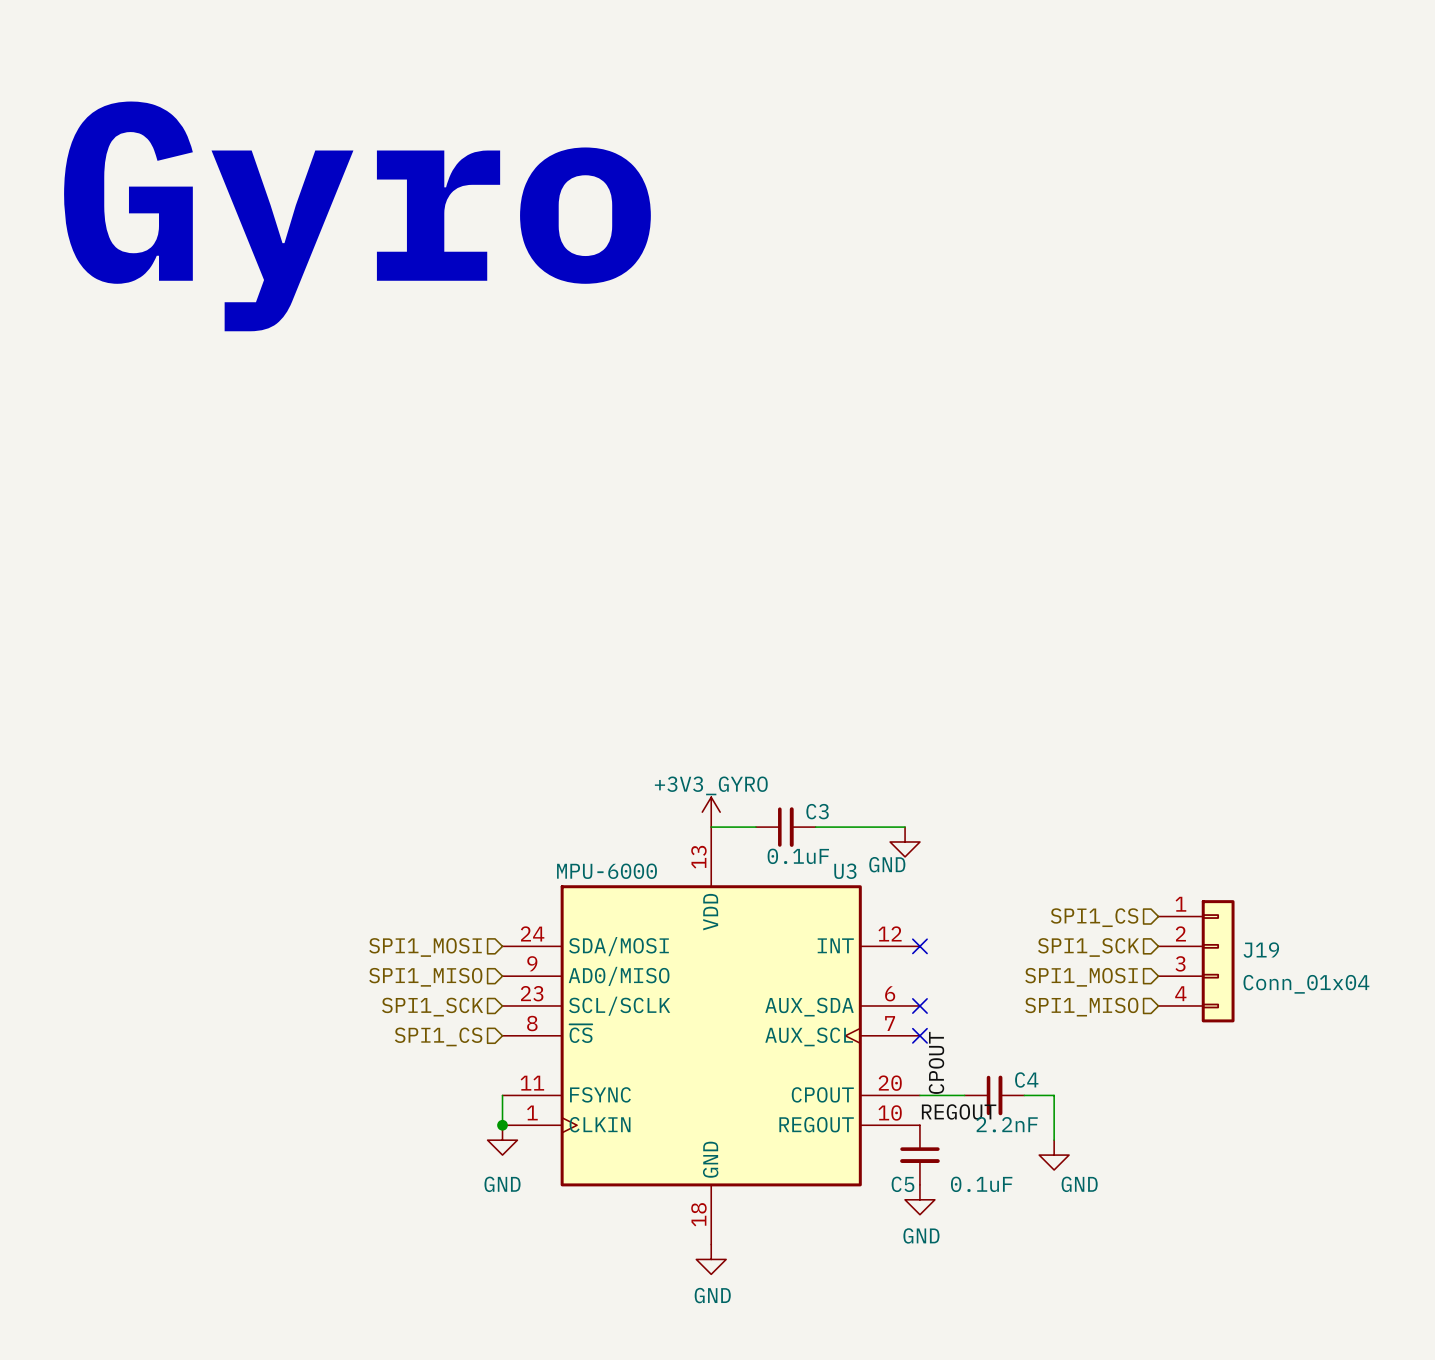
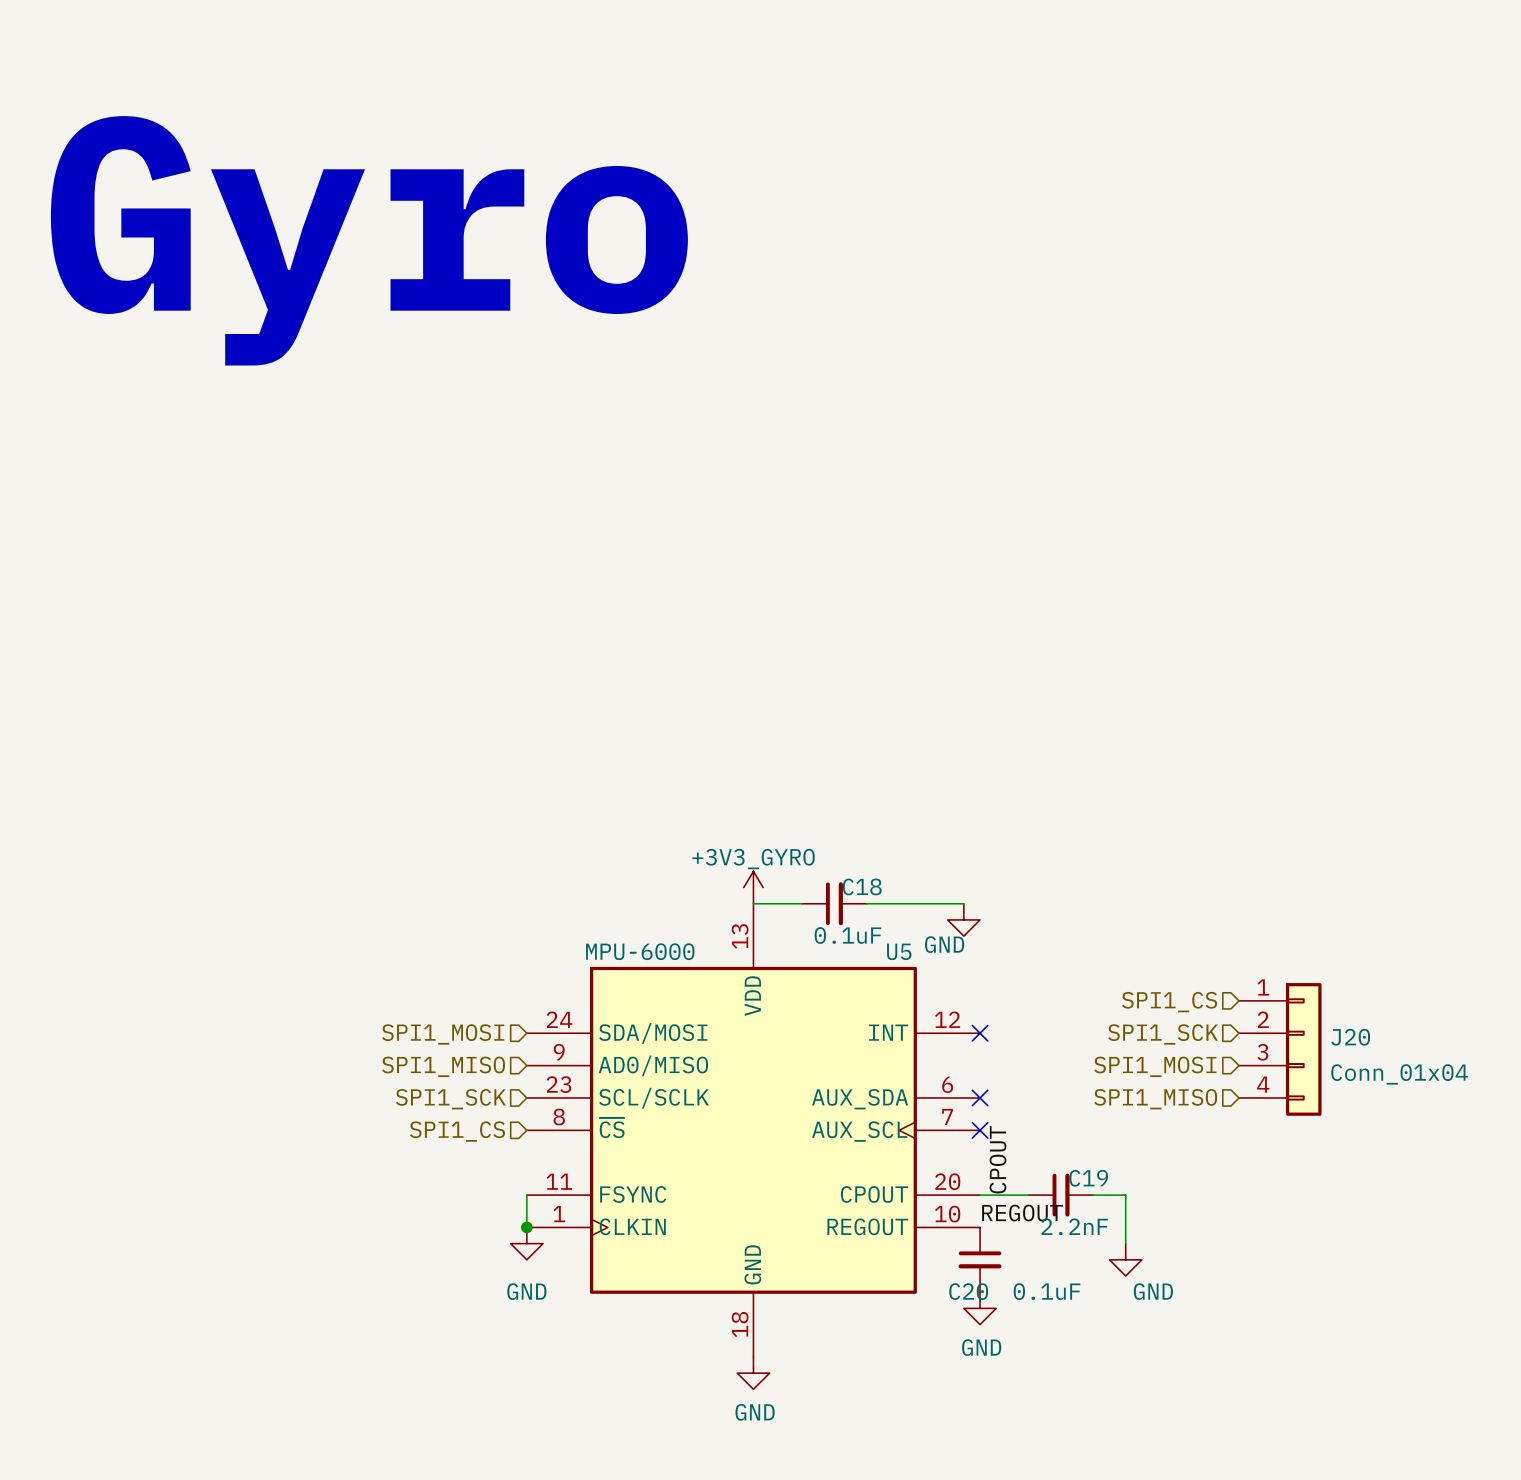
C3 name: C3 (817, 811) -> C18 (862, 886)
U3 name: U3 (845, 871) -> U5 (899, 951)
J19 name: J19 (1261, 950) -> J20 (1350, 1037)
C4 name: C4 (1026, 1079) -> C19 (1088, 1178)
C5 name: C5 (902, 1184) -> C20 (968, 1291)

